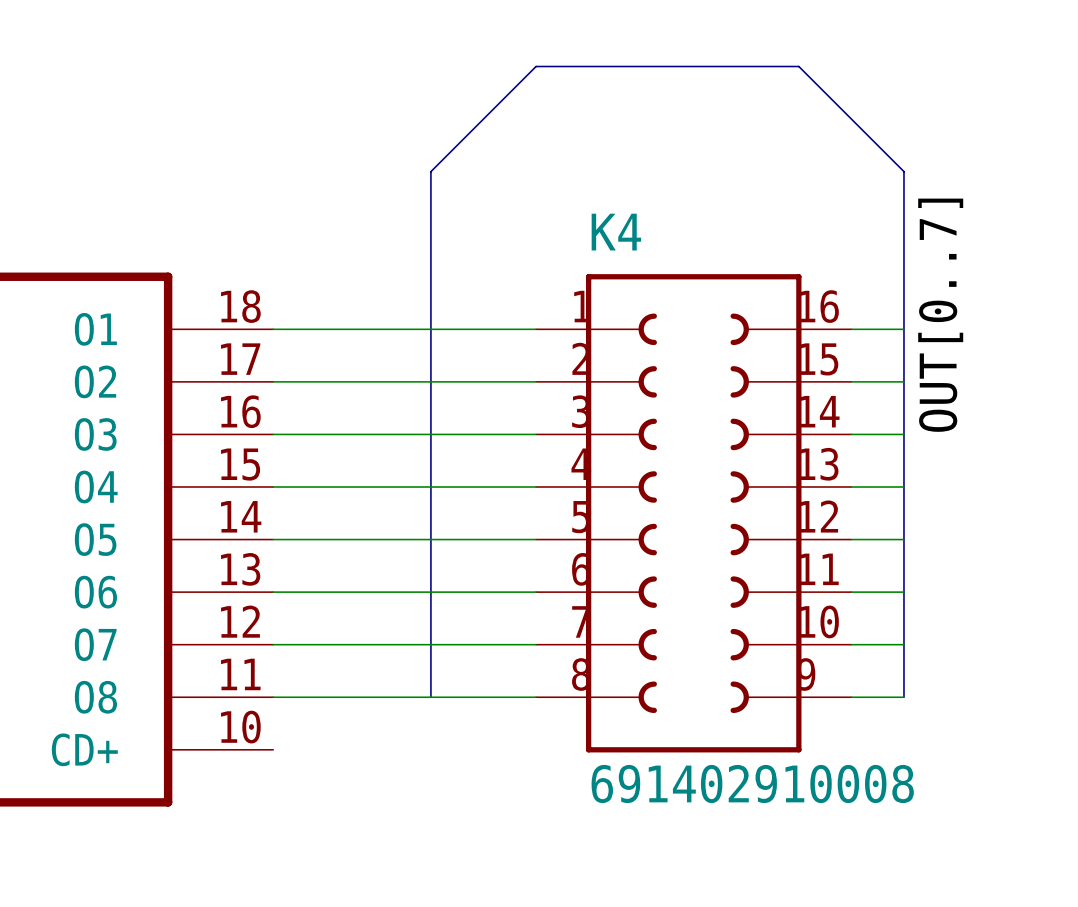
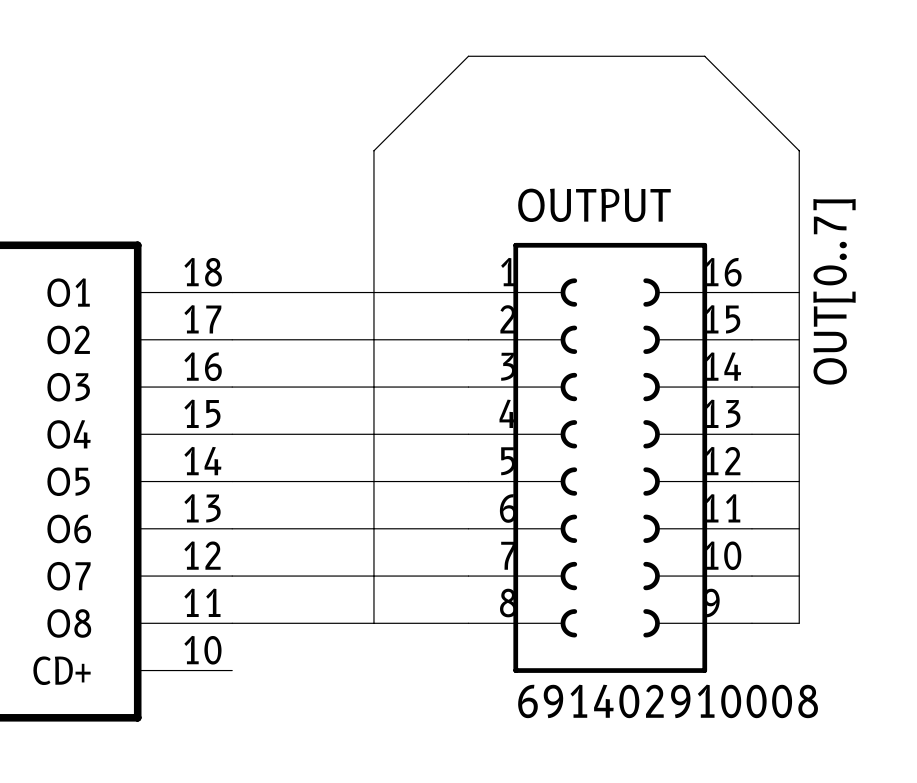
K4 name: K4 (616, 232) -> OUTPUT (594, 205)

